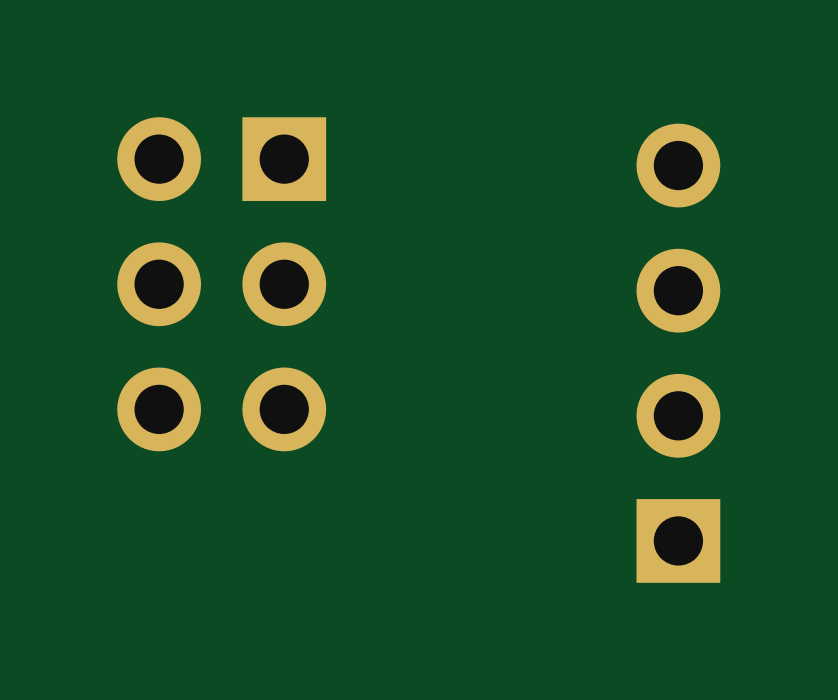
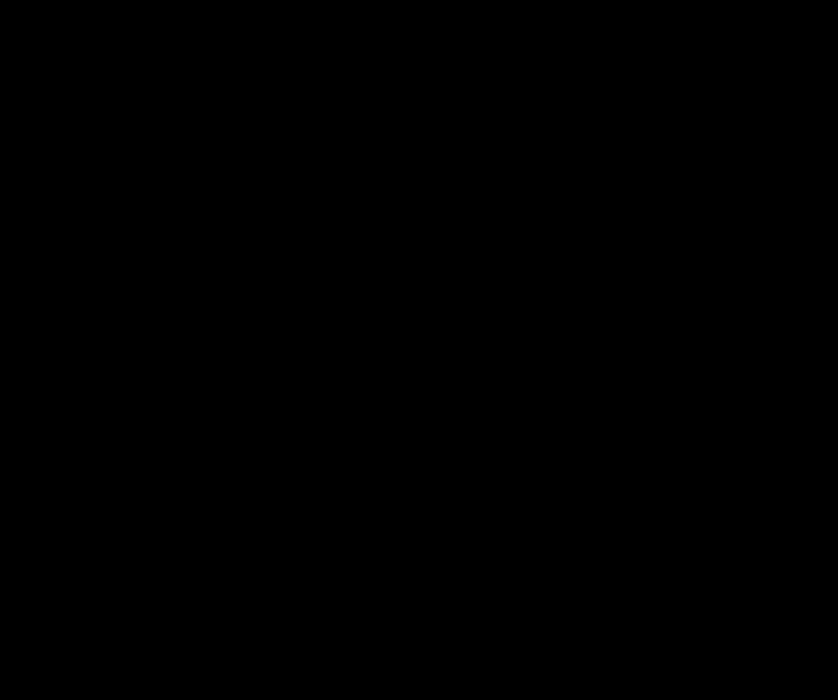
part: (221, 284) -> none
part: (678, 353) -> none

